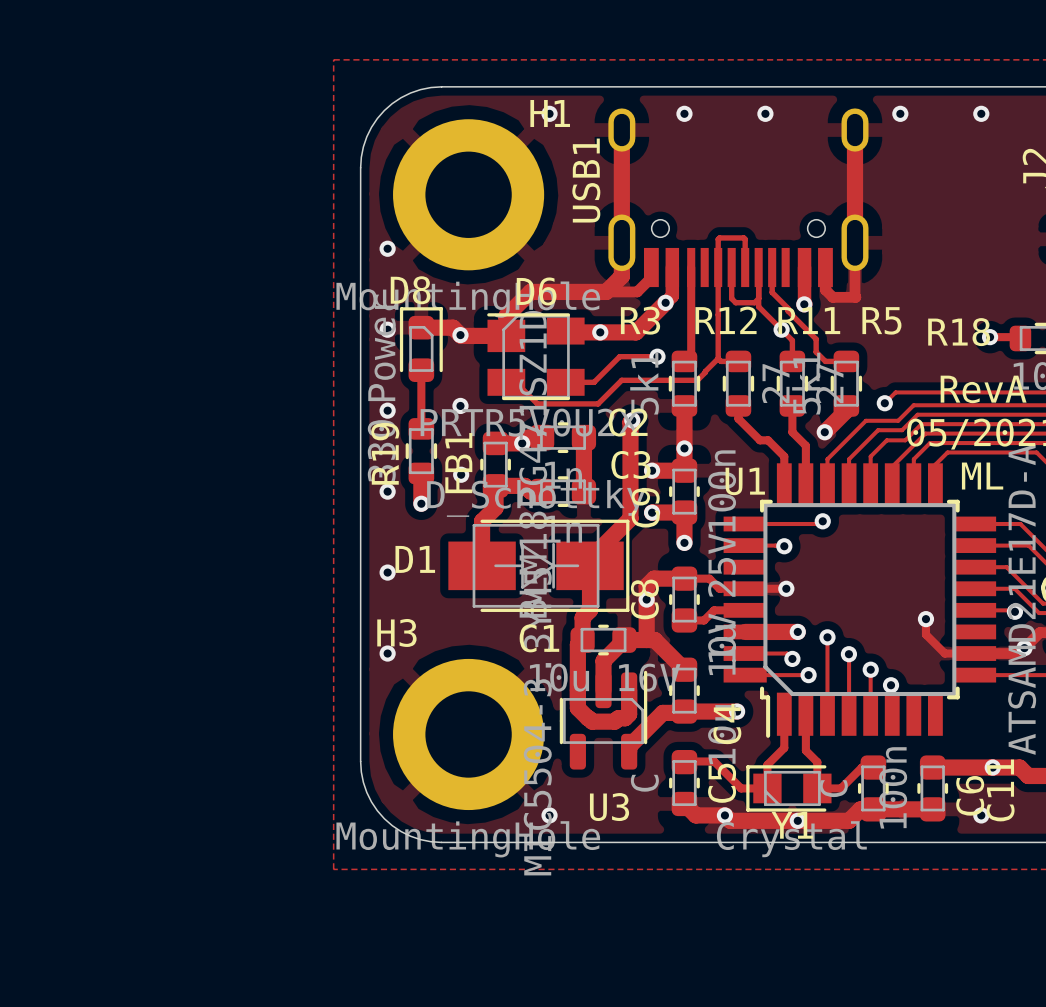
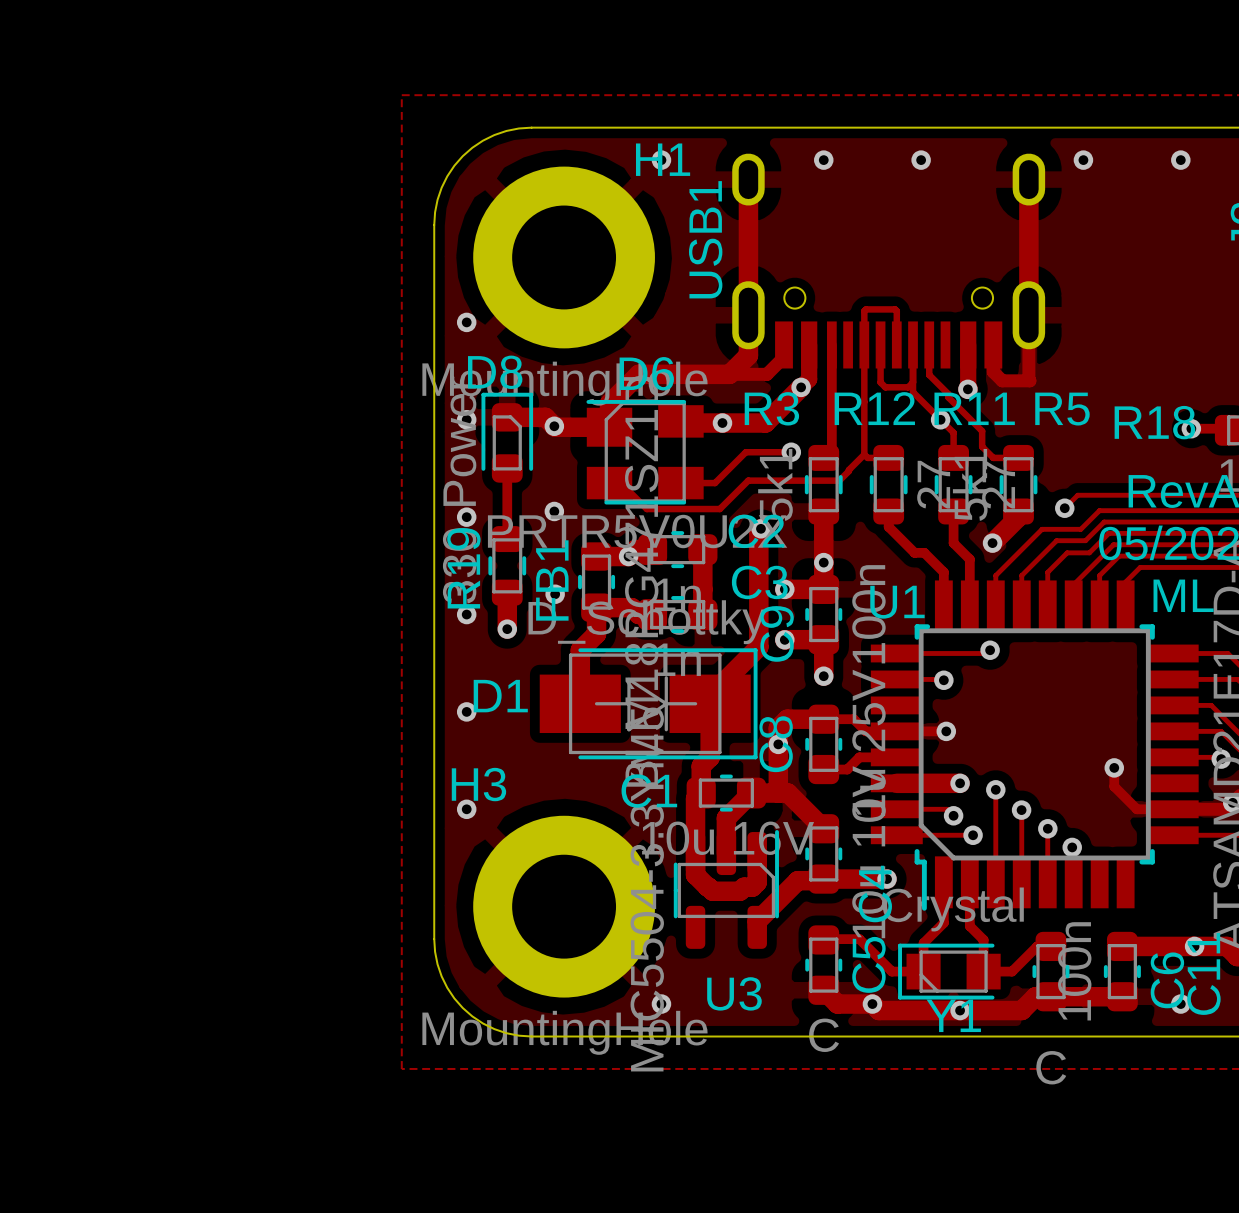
C5 value rotation: 0° (644, 783) -> 90° clockwise (824, 1035)
C5 value position: C (644, 783) -> C (824, 1035)
C6 value rotation: 0° (833, 788) -> 90° clockwise (1051, 1067)
C6 value position: C (833, 788) -> C (1051, 1067)
Y1 value position: Crystal (791, 839) -> Crystal (953, 909)

